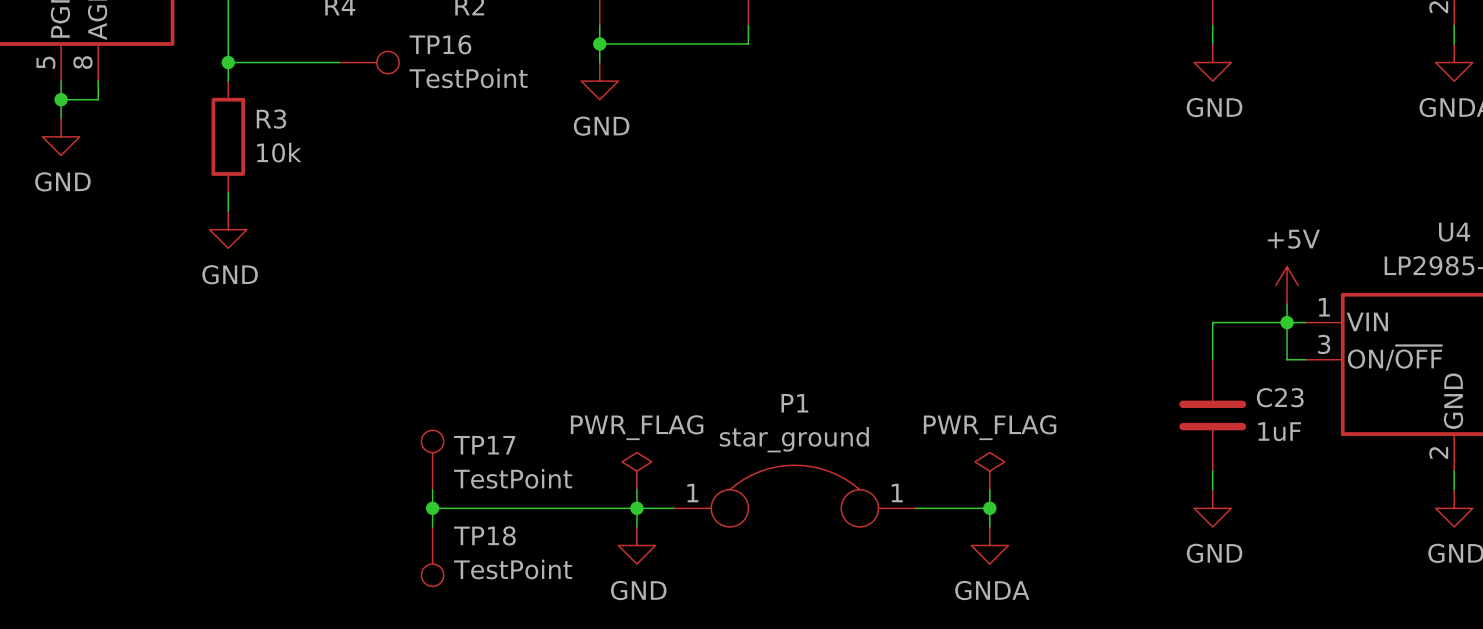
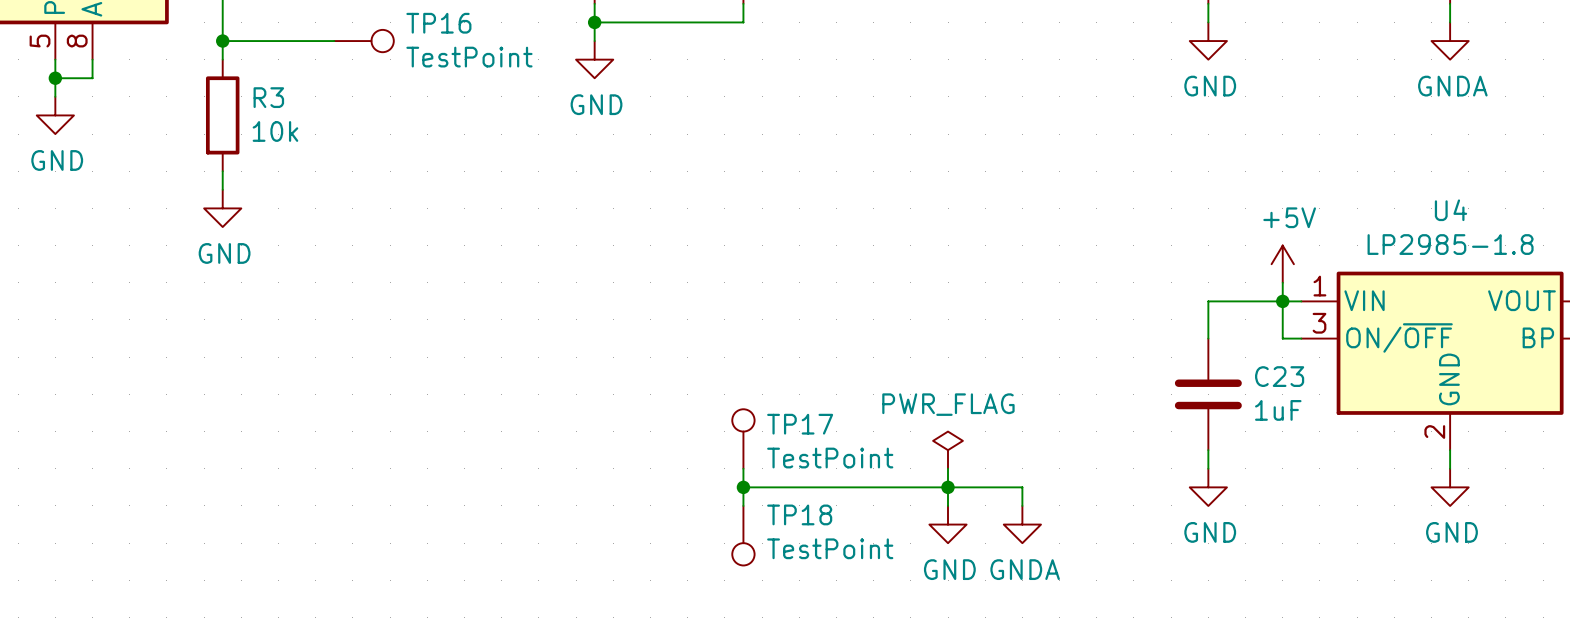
TP17 position: (432, 460) -> (743, 439)
power symbol: PWR_FLAG (636, 471) -> none
power symbol position: PWR_FLAG (989, 471) -> PWR_FLAG (948, 450)
wire: (432, 489) (432, 526) -> (743, 468) (743, 505)
wire: (636, 489) (636, 526) -> (948, 468) (948, 505)
wire: (989, 489) (989, 526) -> none
P1: star_ground (794, 496) -> none
wire: (432, 508) (674, 508) -> none
junction: (432, 508) -> none
junction: (636, 508) -> none
wire: none -> (743, 487) (910, 487)
junction: none -> (743, 487)
wire: none -> (985, 487) (1022, 487) (1022, 505)
junction position: (989, 508) -> (948, 487)
power symbol position: GND (636, 545) -> GND (948, 524)
power symbol position: GNDA (989, 545) -> GNDA (1022, 524)
TP18 position: (432, 556) -> (743, 535)

